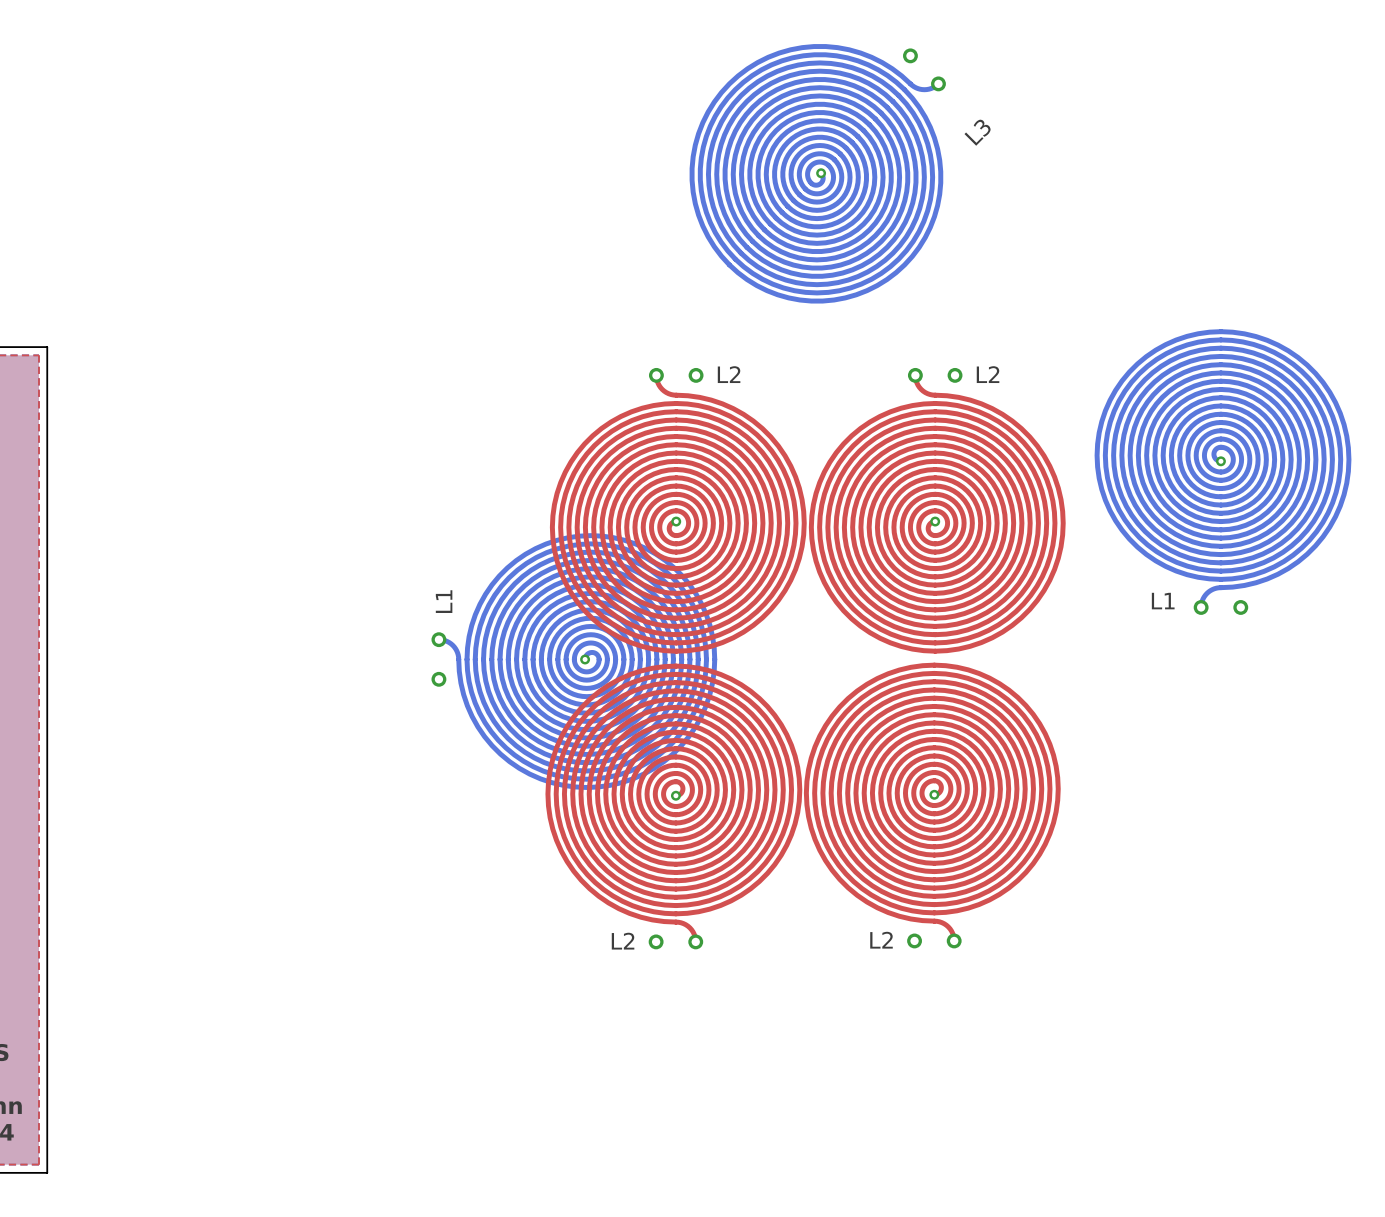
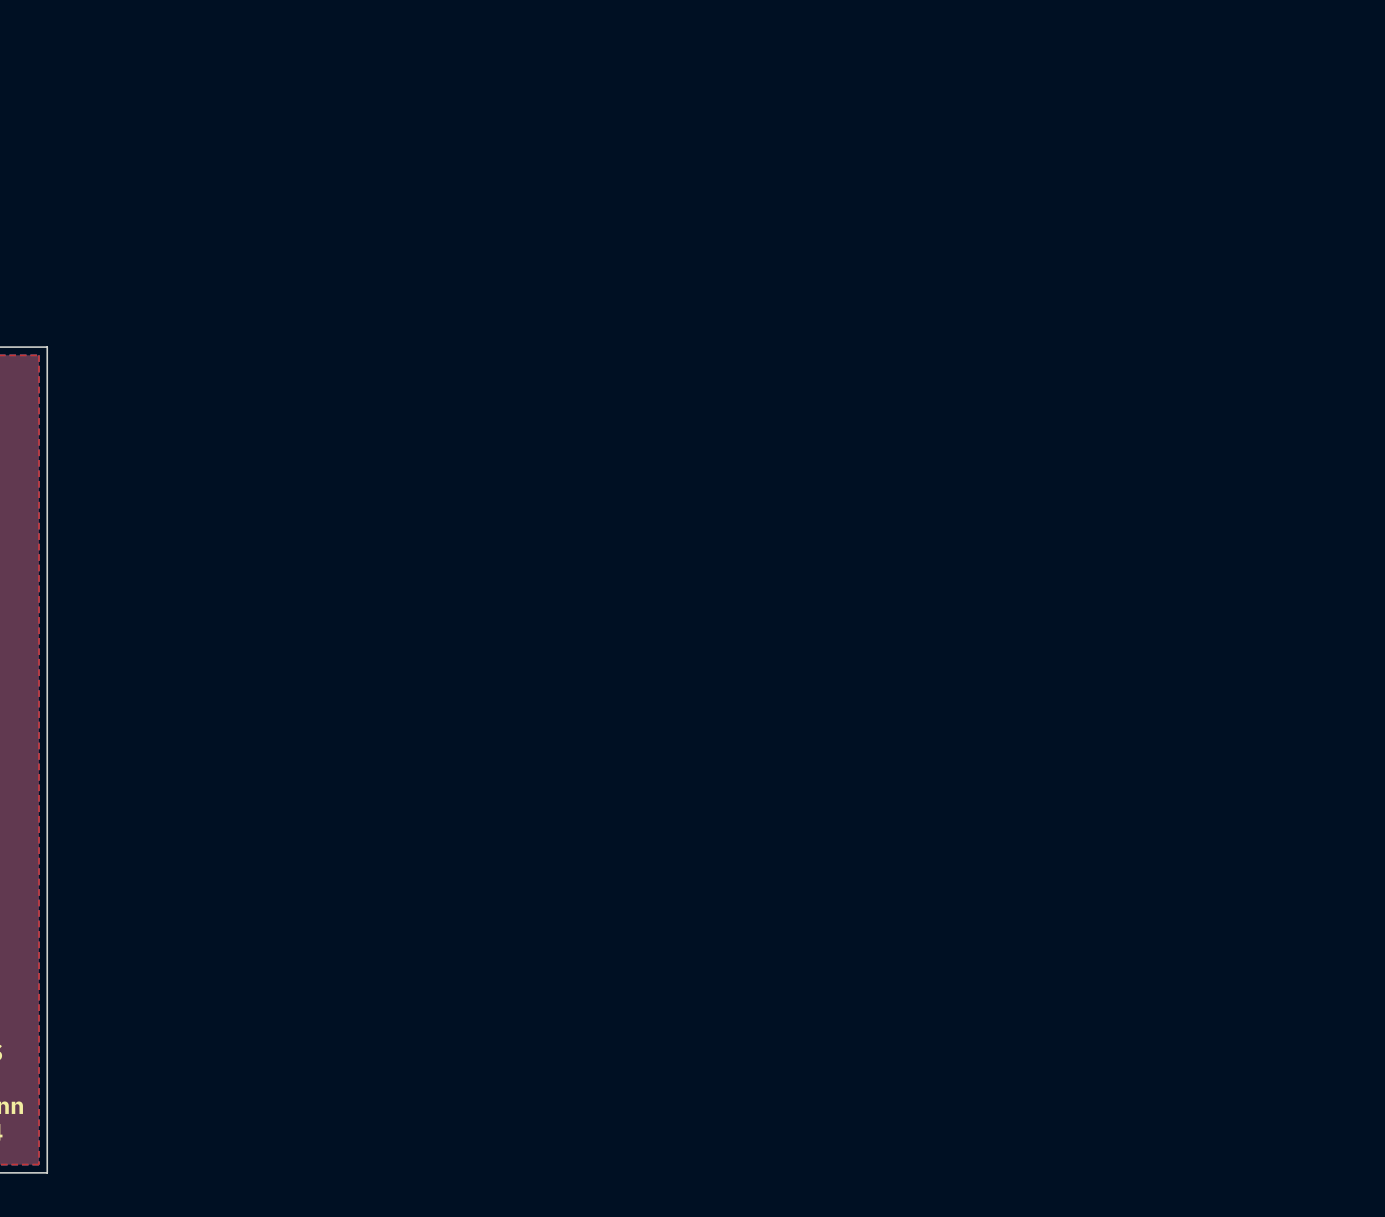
L3: (817, 173) -> none
L1: (1223, 472) -> none
L2: (678, 510) -> none
L2: (937, 510) -> none
L1: (574, 661) -> none
L2: (932, 805) -> none
L2: (673, 806) -> none

